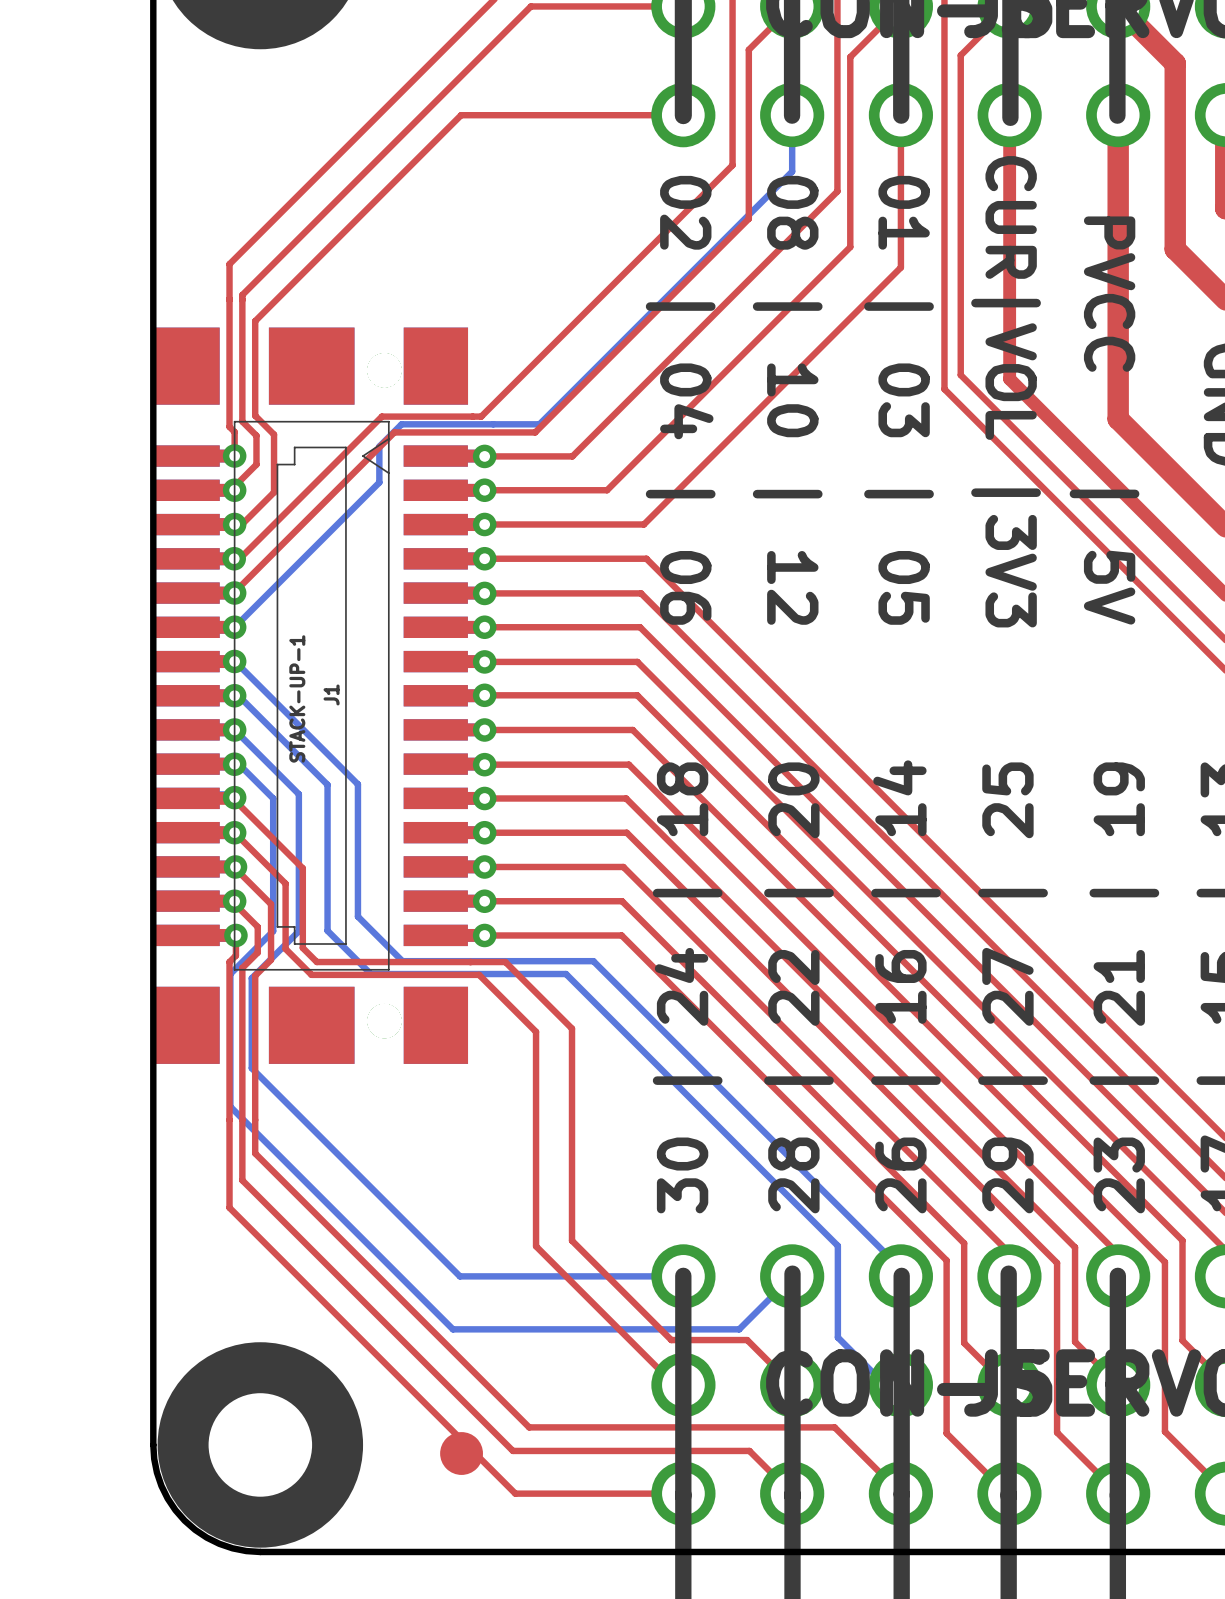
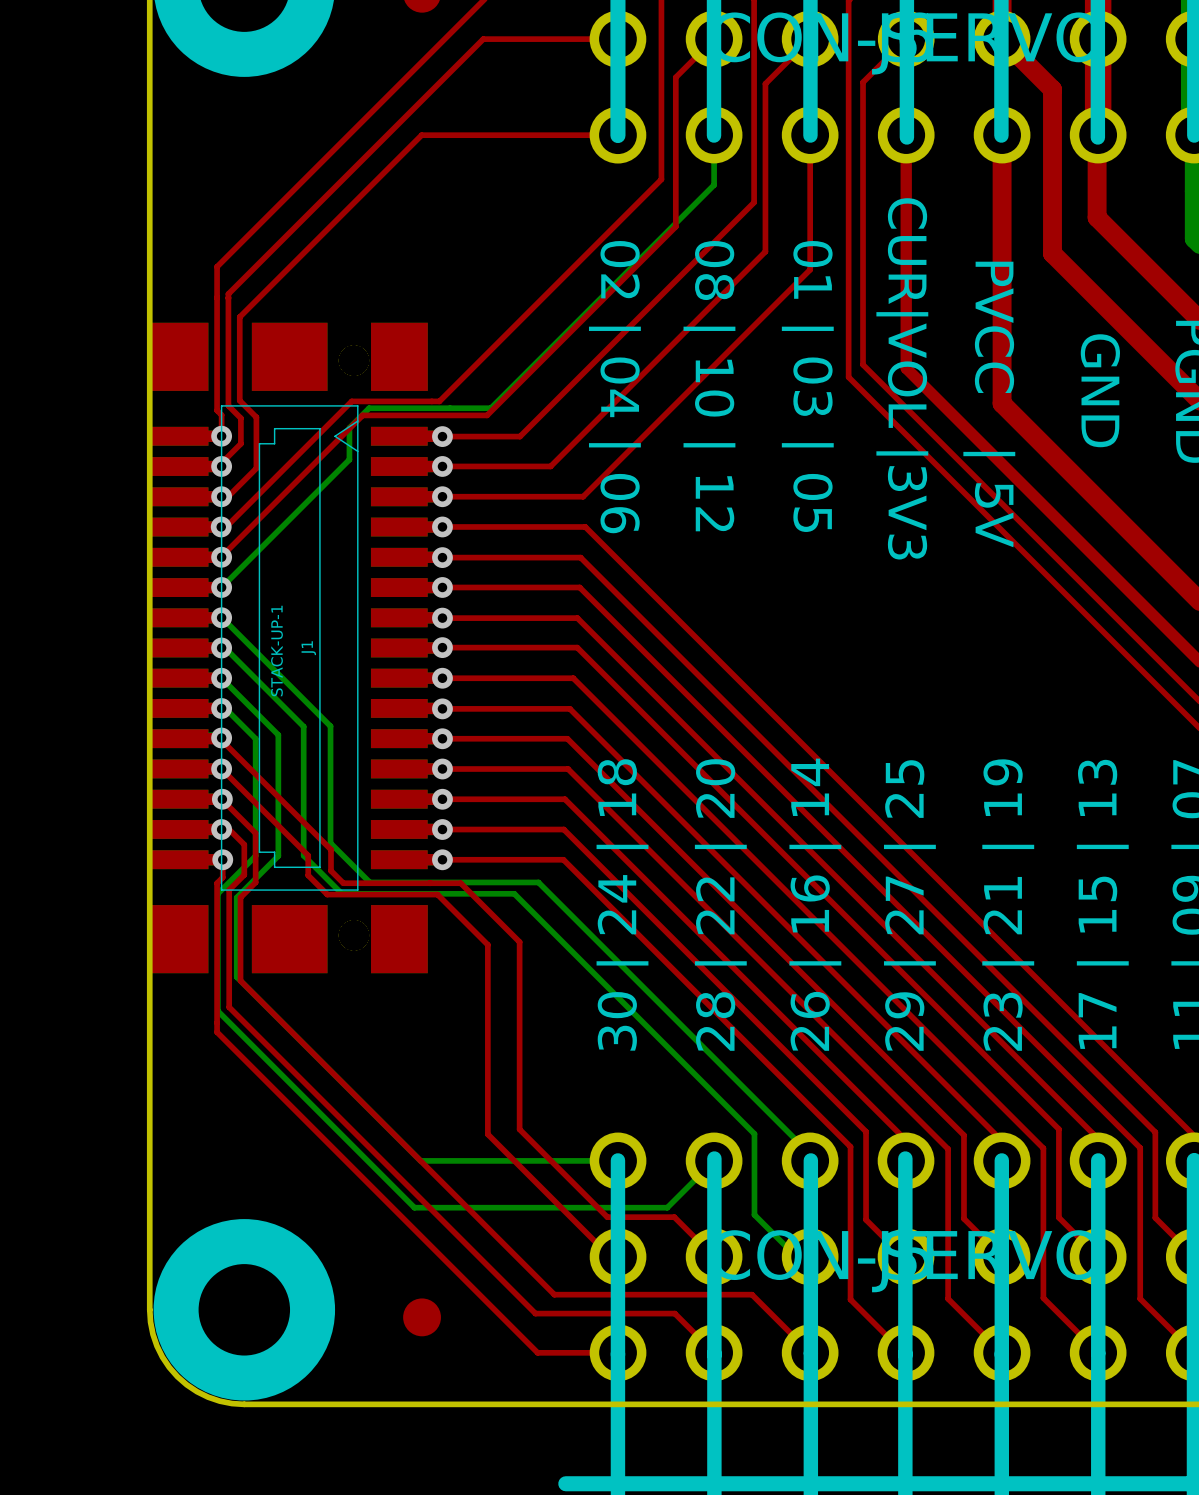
top track: (235, 867) (271, 904) (271, 959) (255, 975) (255, 1153) (529, 1427) (834, 1427) -> (222, 800) (255, 833) (255, 882) (240, 897) (240, 980) (554, 1294) (752, 1294)
top track: (302, 868) (302, 947) (316, 962) (372, 962) -> (281, 800) (330, 849) (330, 870) (343, 883)
top track: (285, 883) (285, 948) (311, 974) (354, 974) -> (266, 814) (308, 855) (308, 875) (327, 894)
top track: (234, 901) (234, 903) (257, 926) (257, 952) (242, 968) (242, 1180) (512, 1450) (749, 1450) -> (221, 829) (229, 829) (244, 844) (244, 874) (229, 890) (229, 1007) (535, 1313) (676, 1315)
top track: (229, 1130) (229, 1207) (515, 1493) (592, 1493) -> (217, 1032) (537, 1352)

